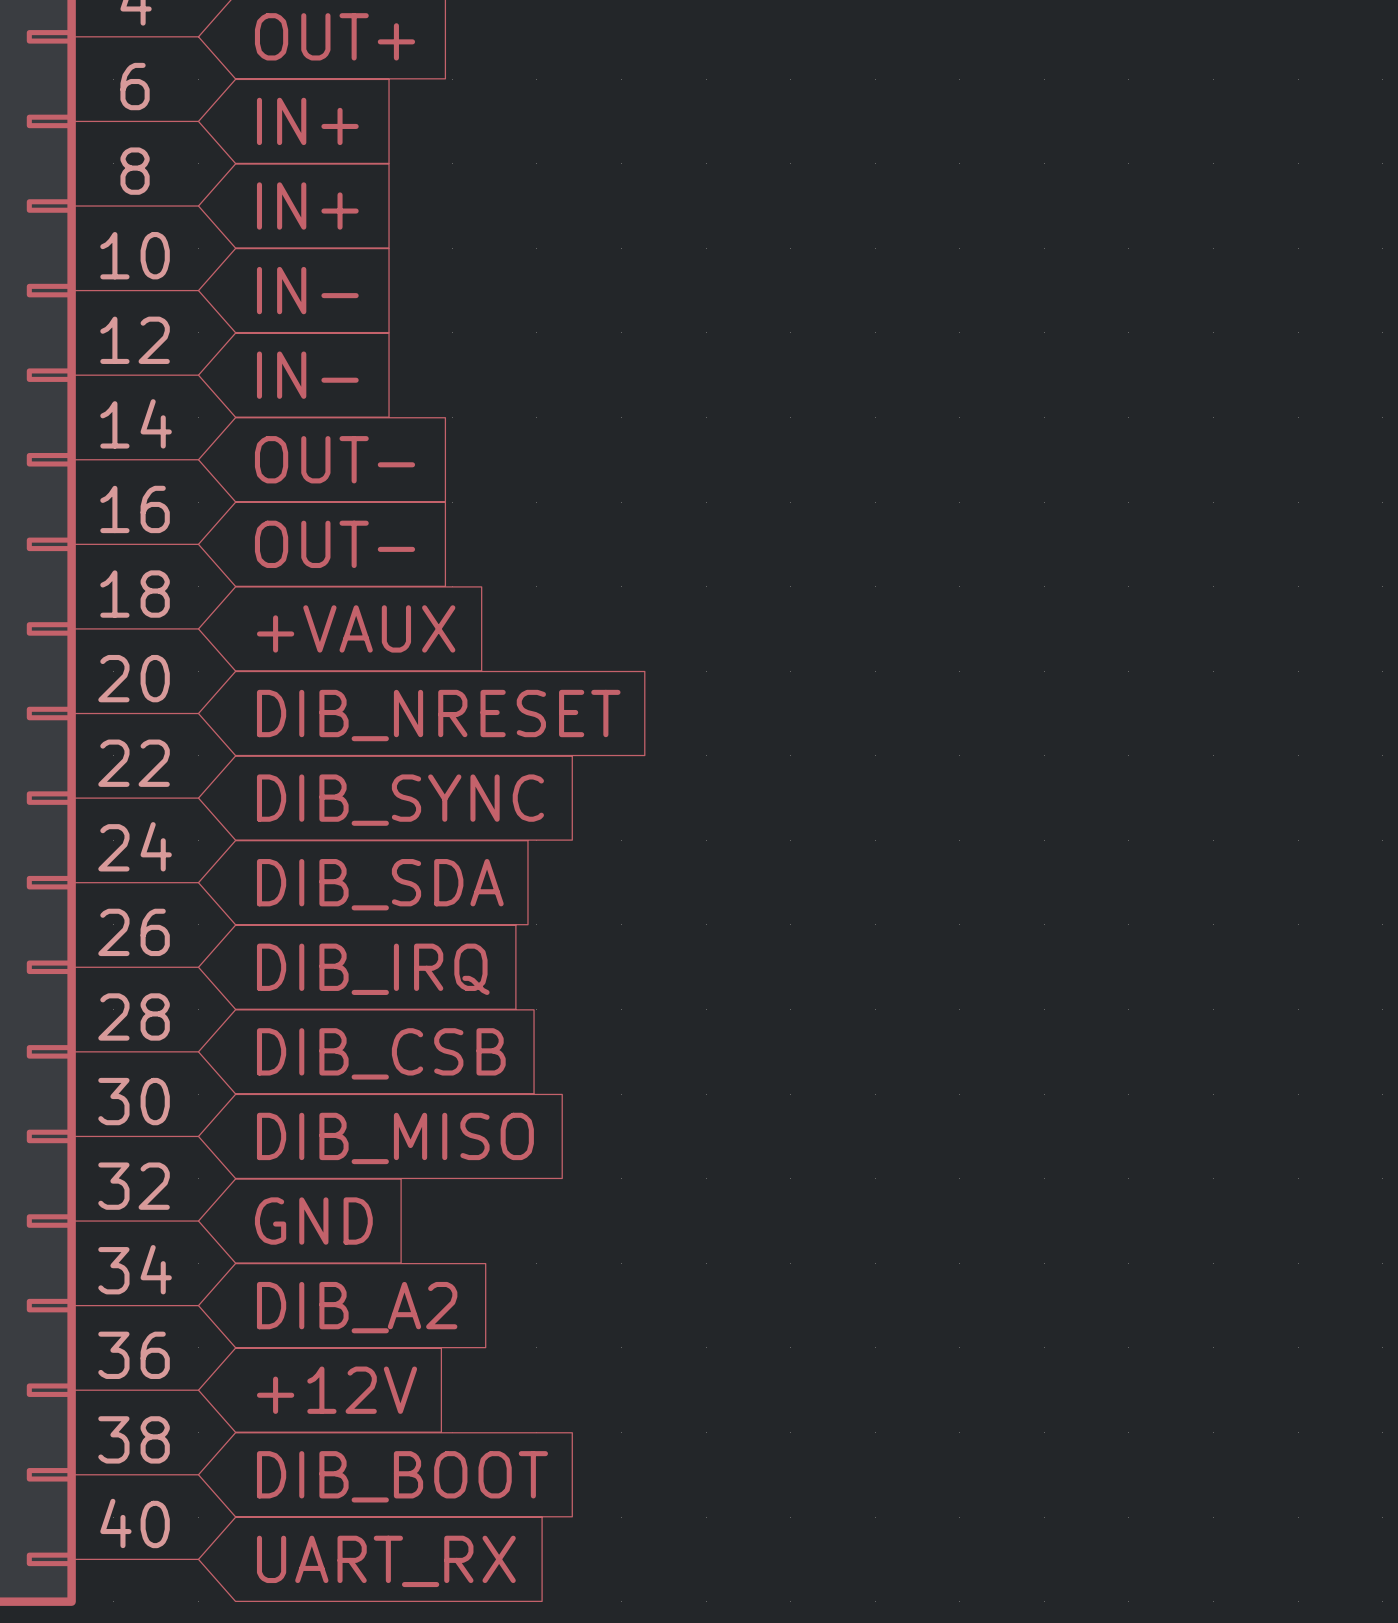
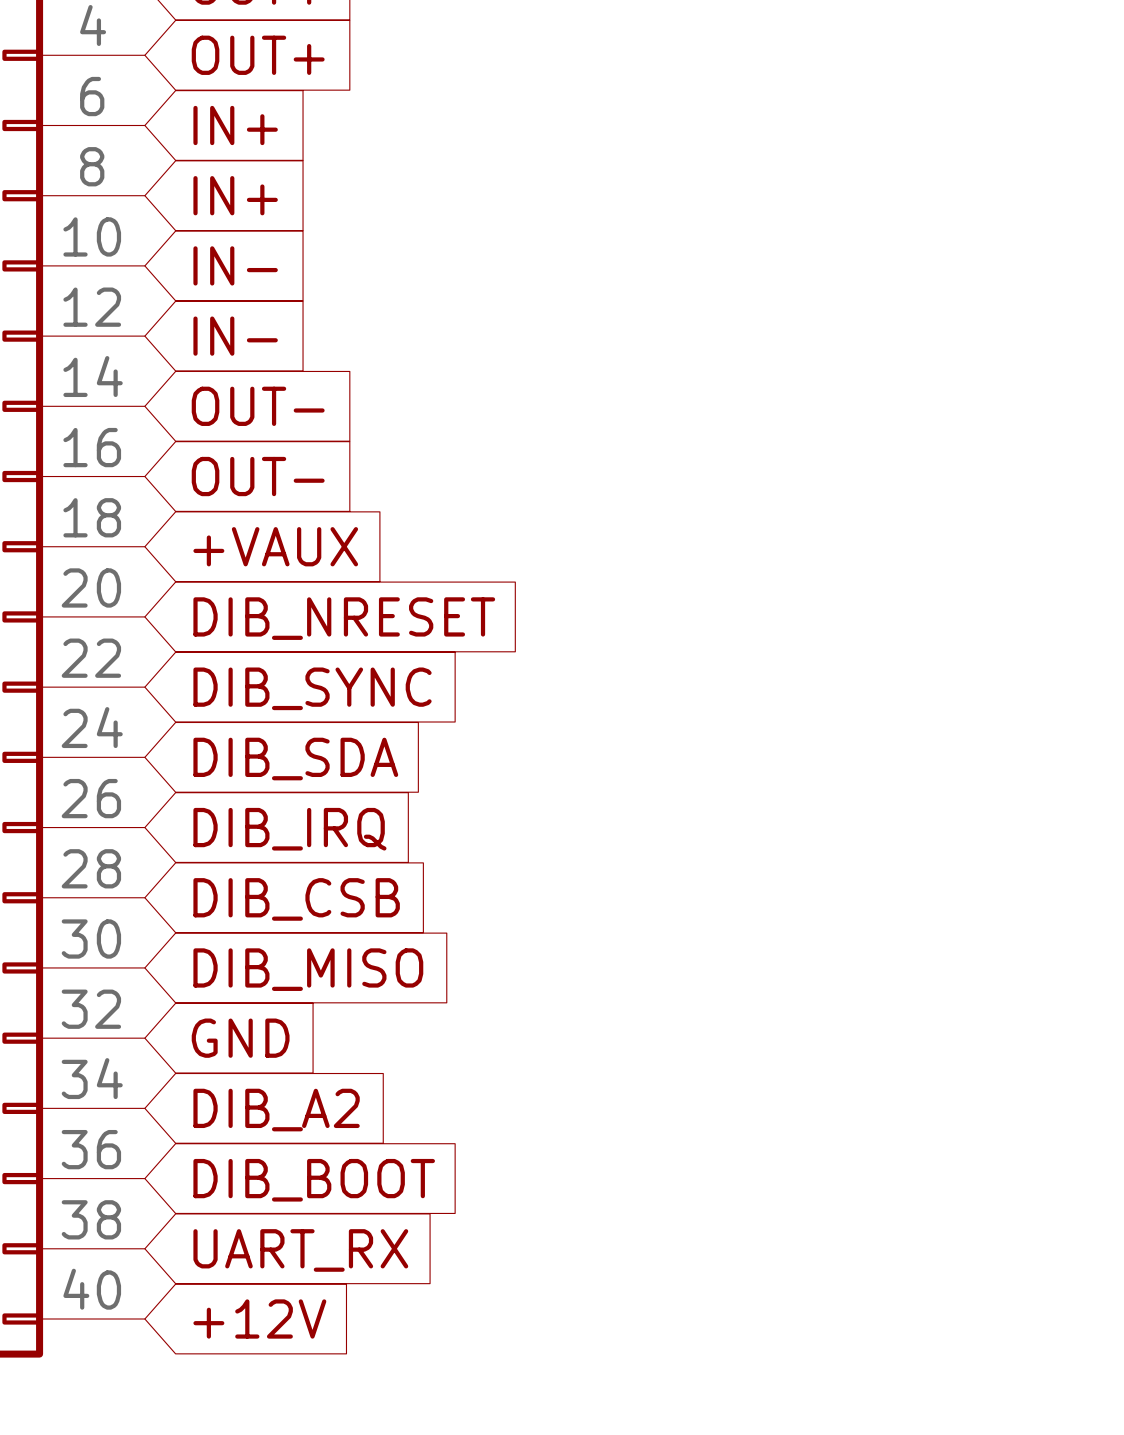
global label: +12V (337, 1390) -> DIB_BOOT (314, 1180)
global label: DIB_BOOT (402, 1476) -> UART_RX (300, 1250)
global label: UART_RX (386, 1561) -> +12V (259, 1318)

